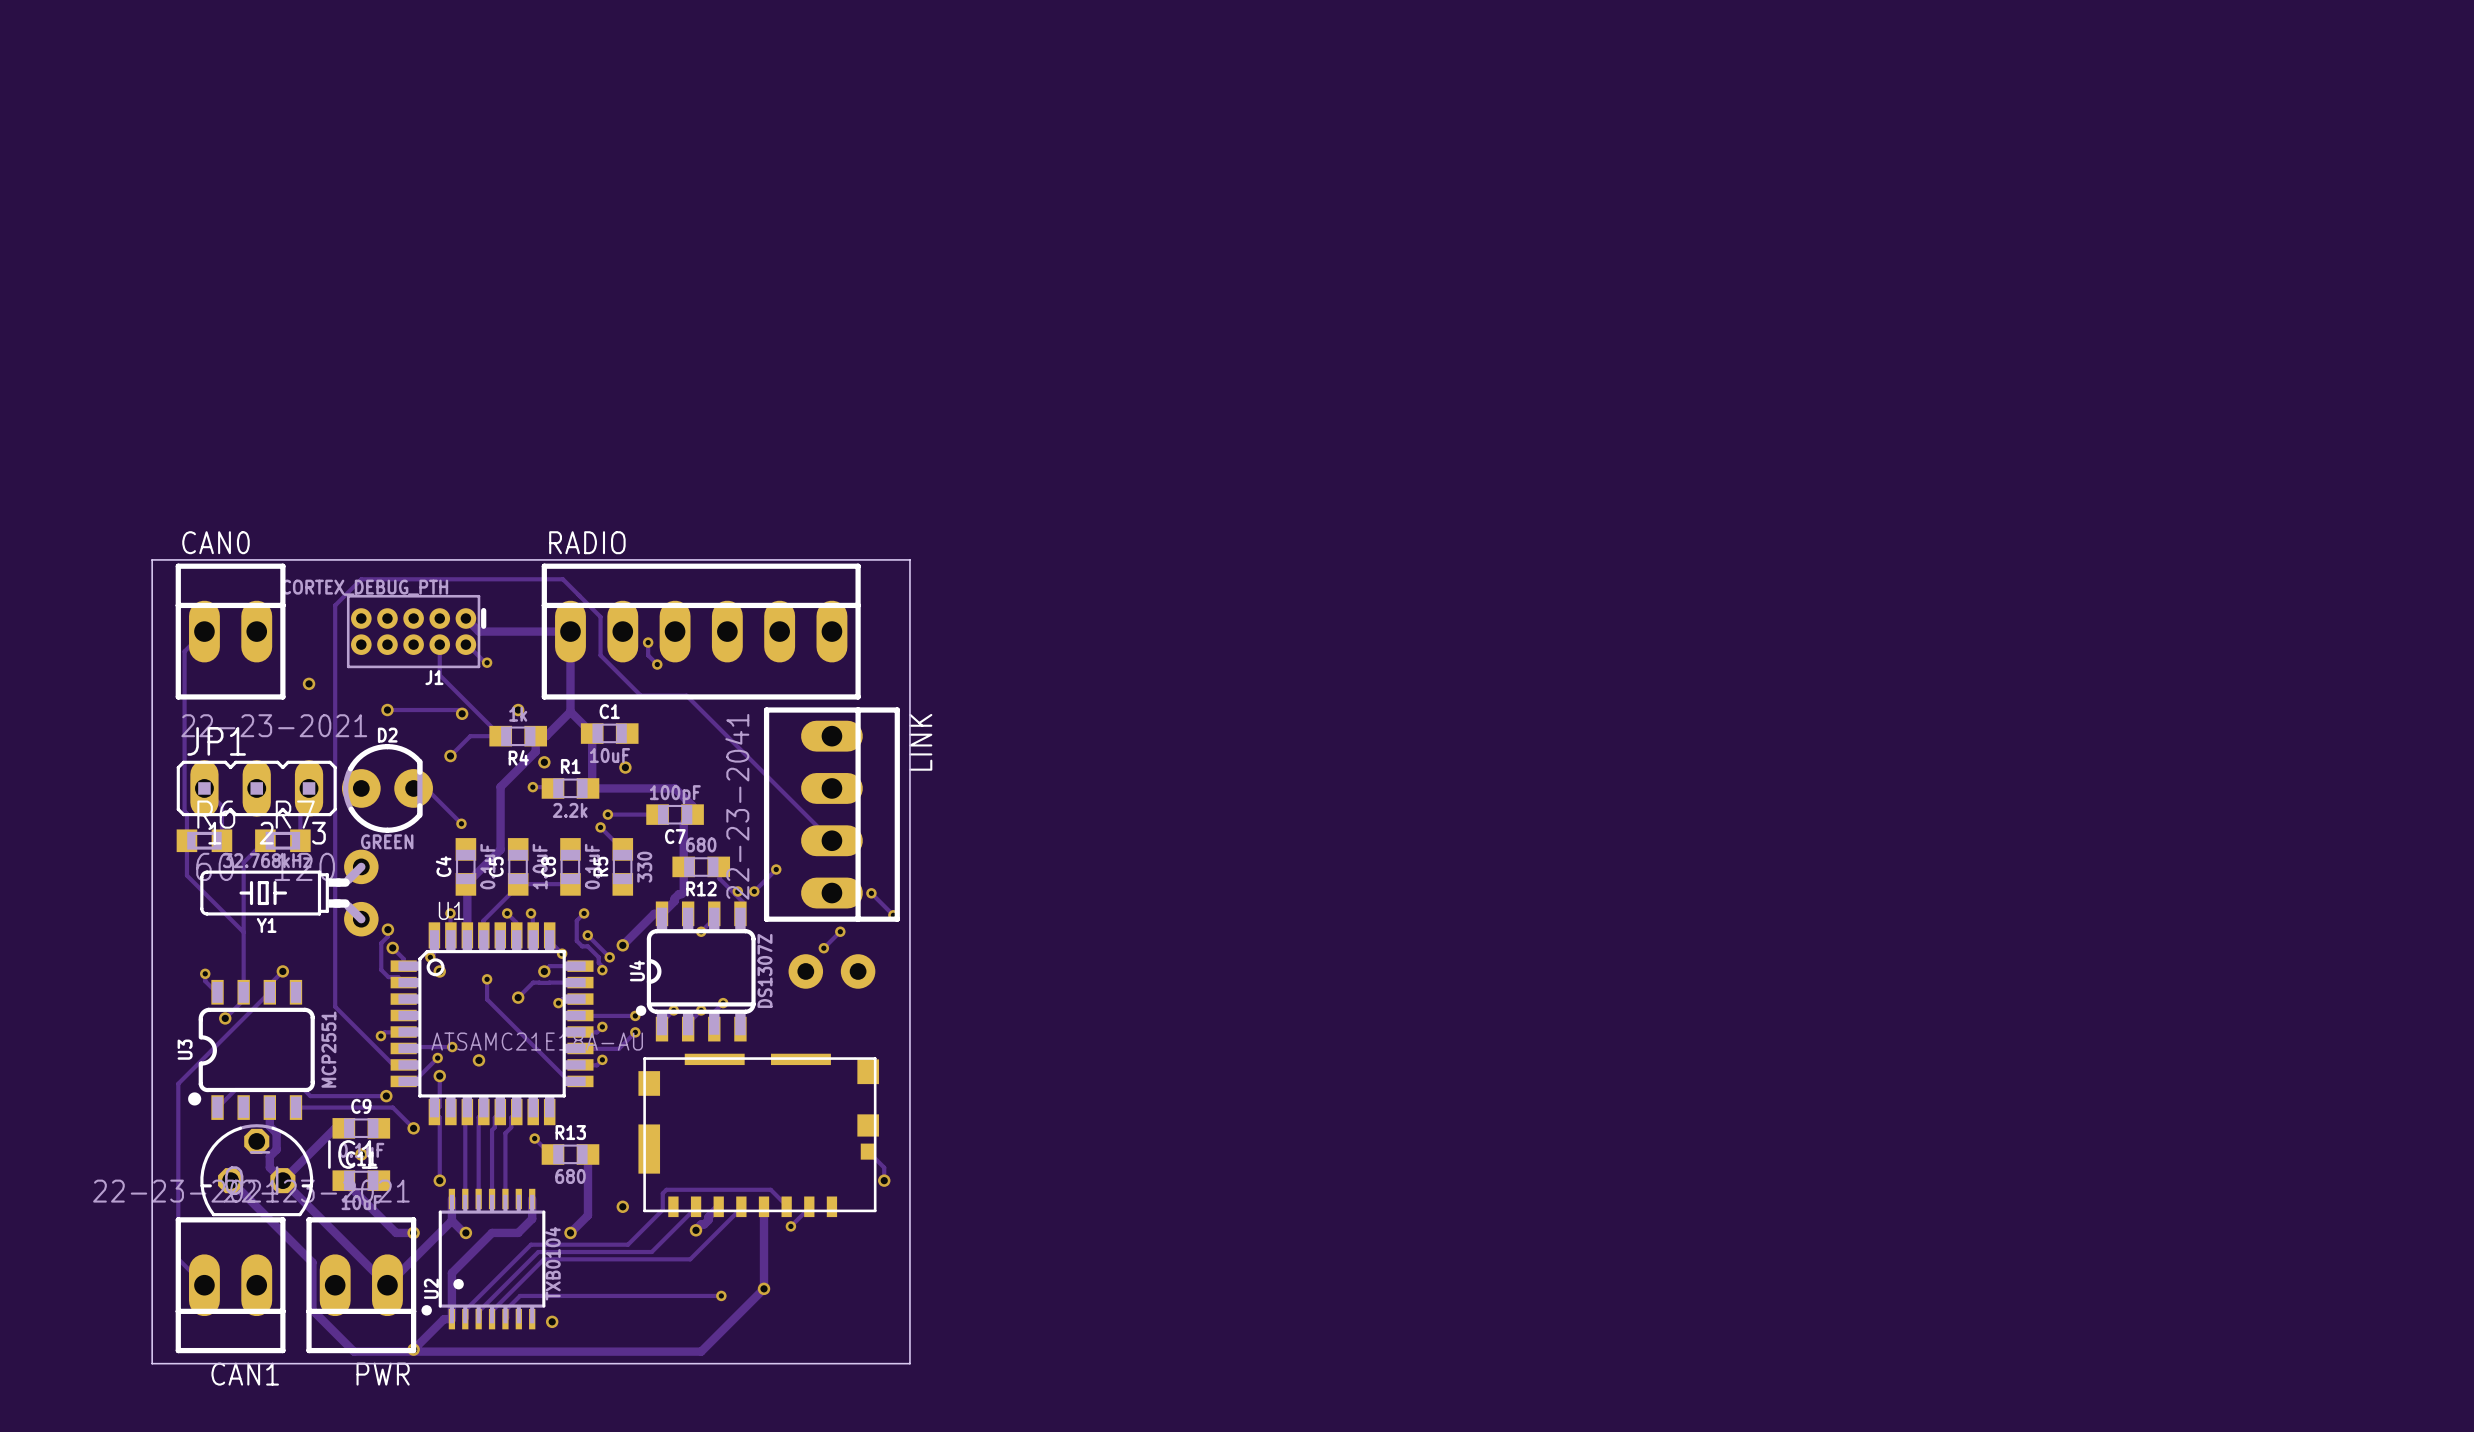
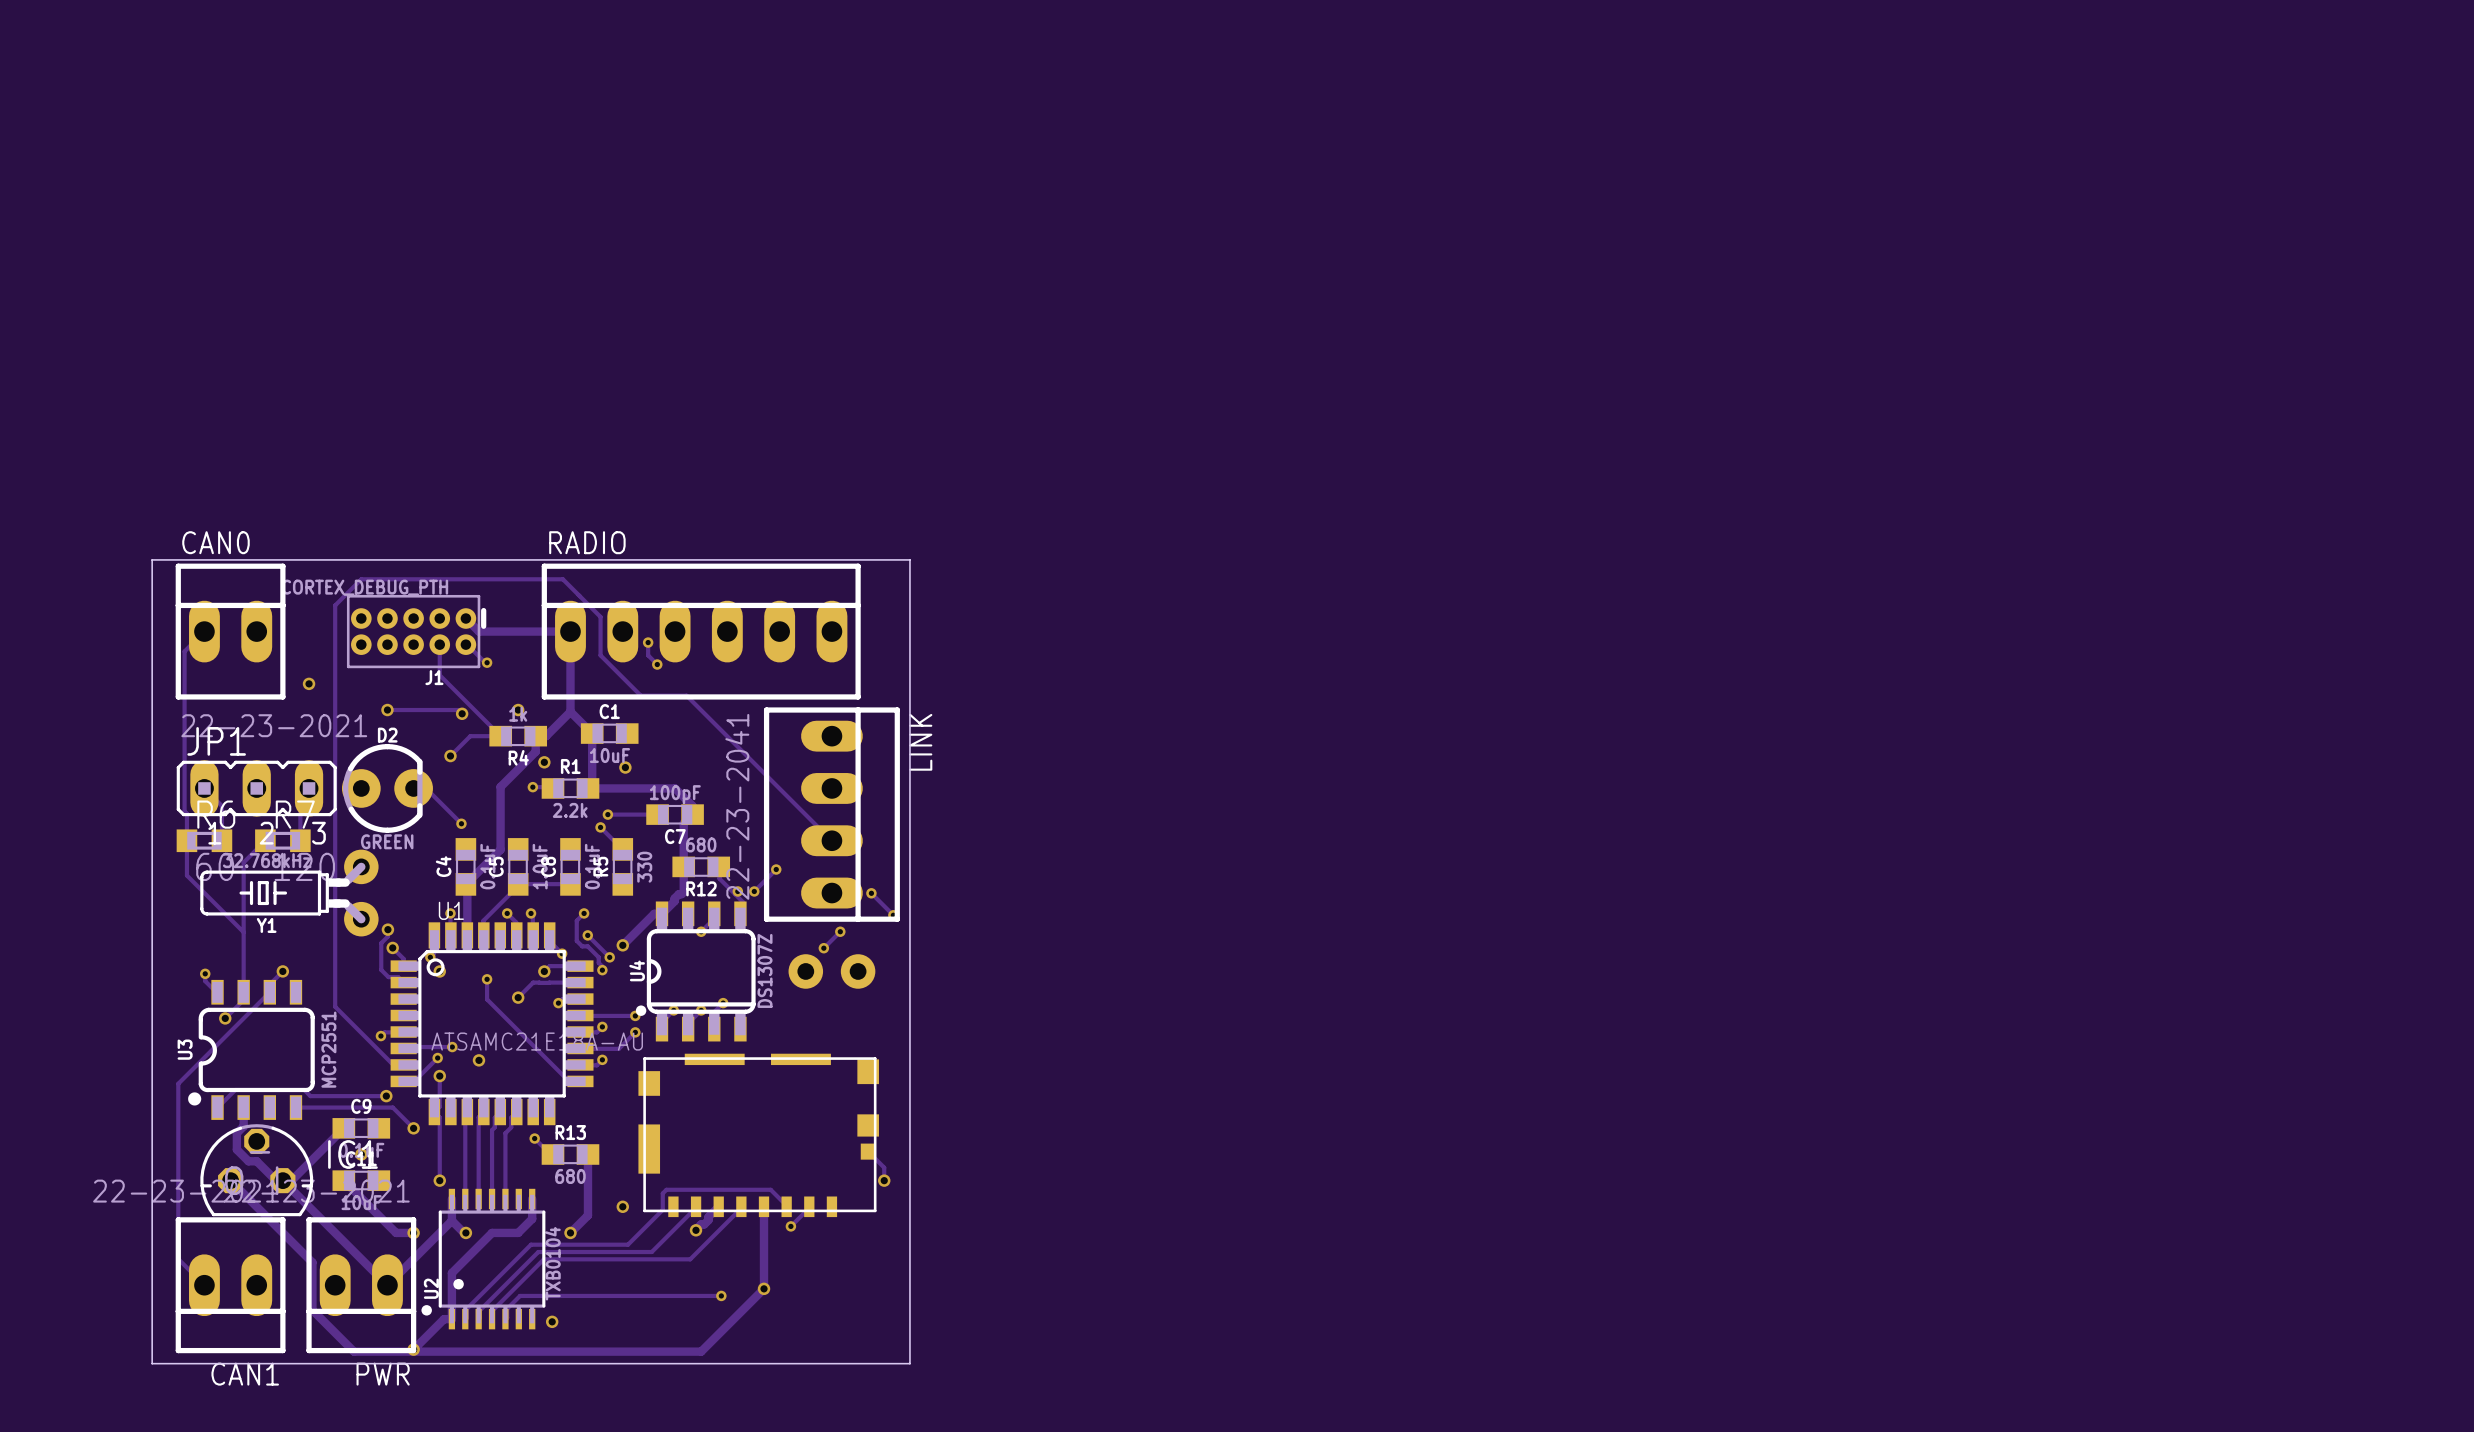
track: (269, 1107) (269, 1126) (276, 1133) (276, 1149) (269, 1156) (269, 1167) (282, 1180) (335, 1128) (343, 1128) -> (243, 1107) (243, 1126) (236, 1133) (236, 1149) (248, 1161) (256, 1161) (276, 1180) (291, 1180) (343, 1128)

